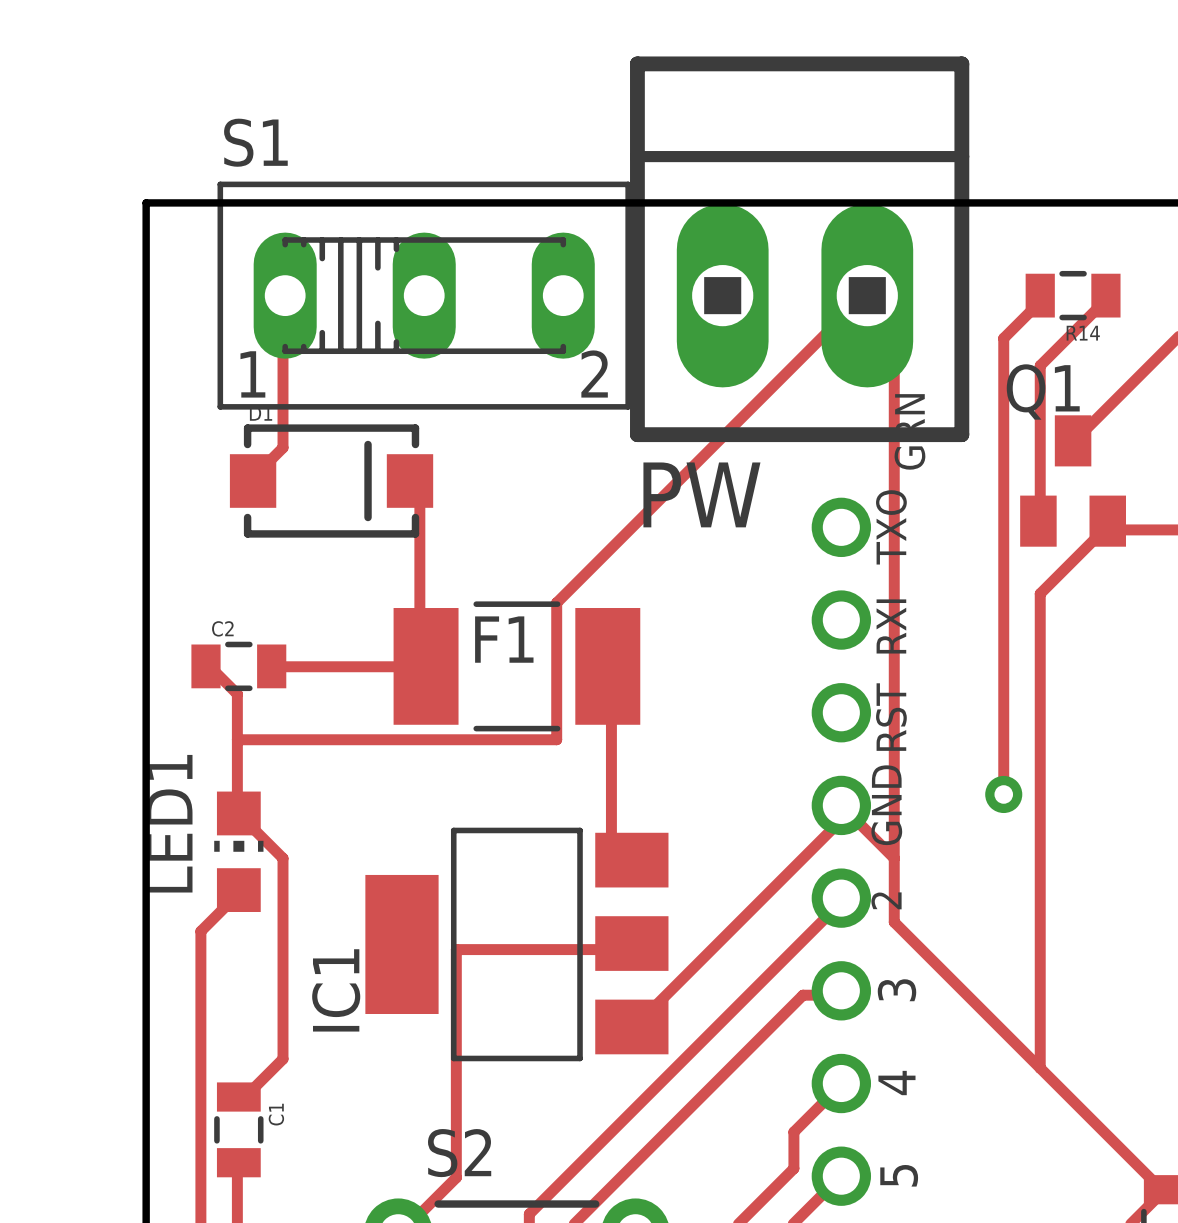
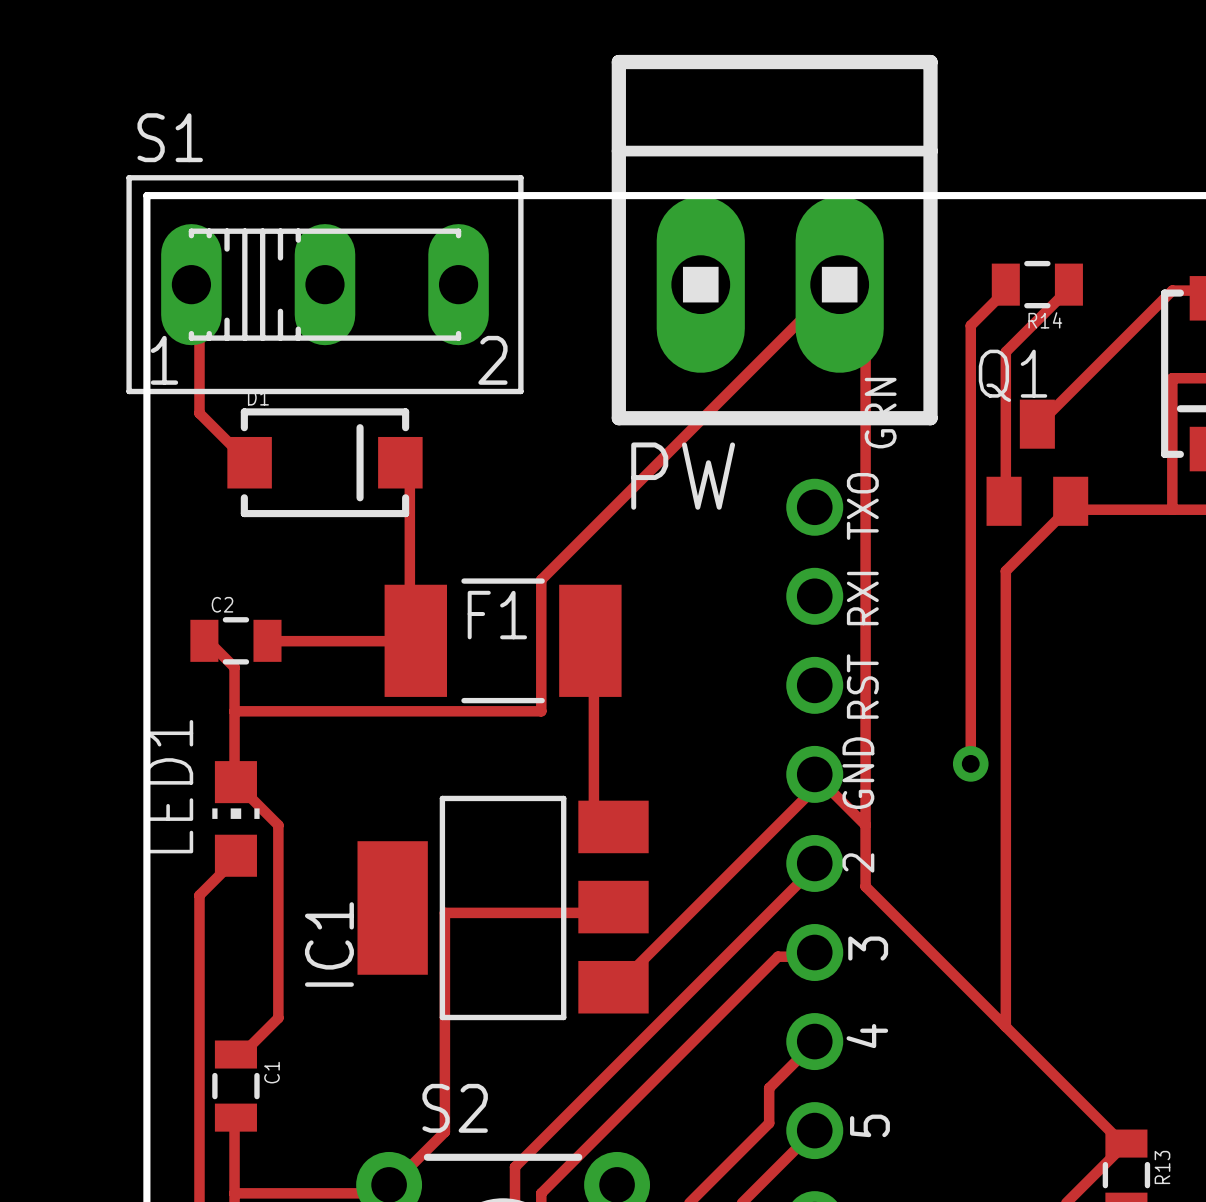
track: (285, 295) (283, 301) (283, 447) (255, 475) (253, 481) -> (191, 284) (199, 290) (199, 413) (249, 462)
S1 position: (424, 295) -> (324, 284)

